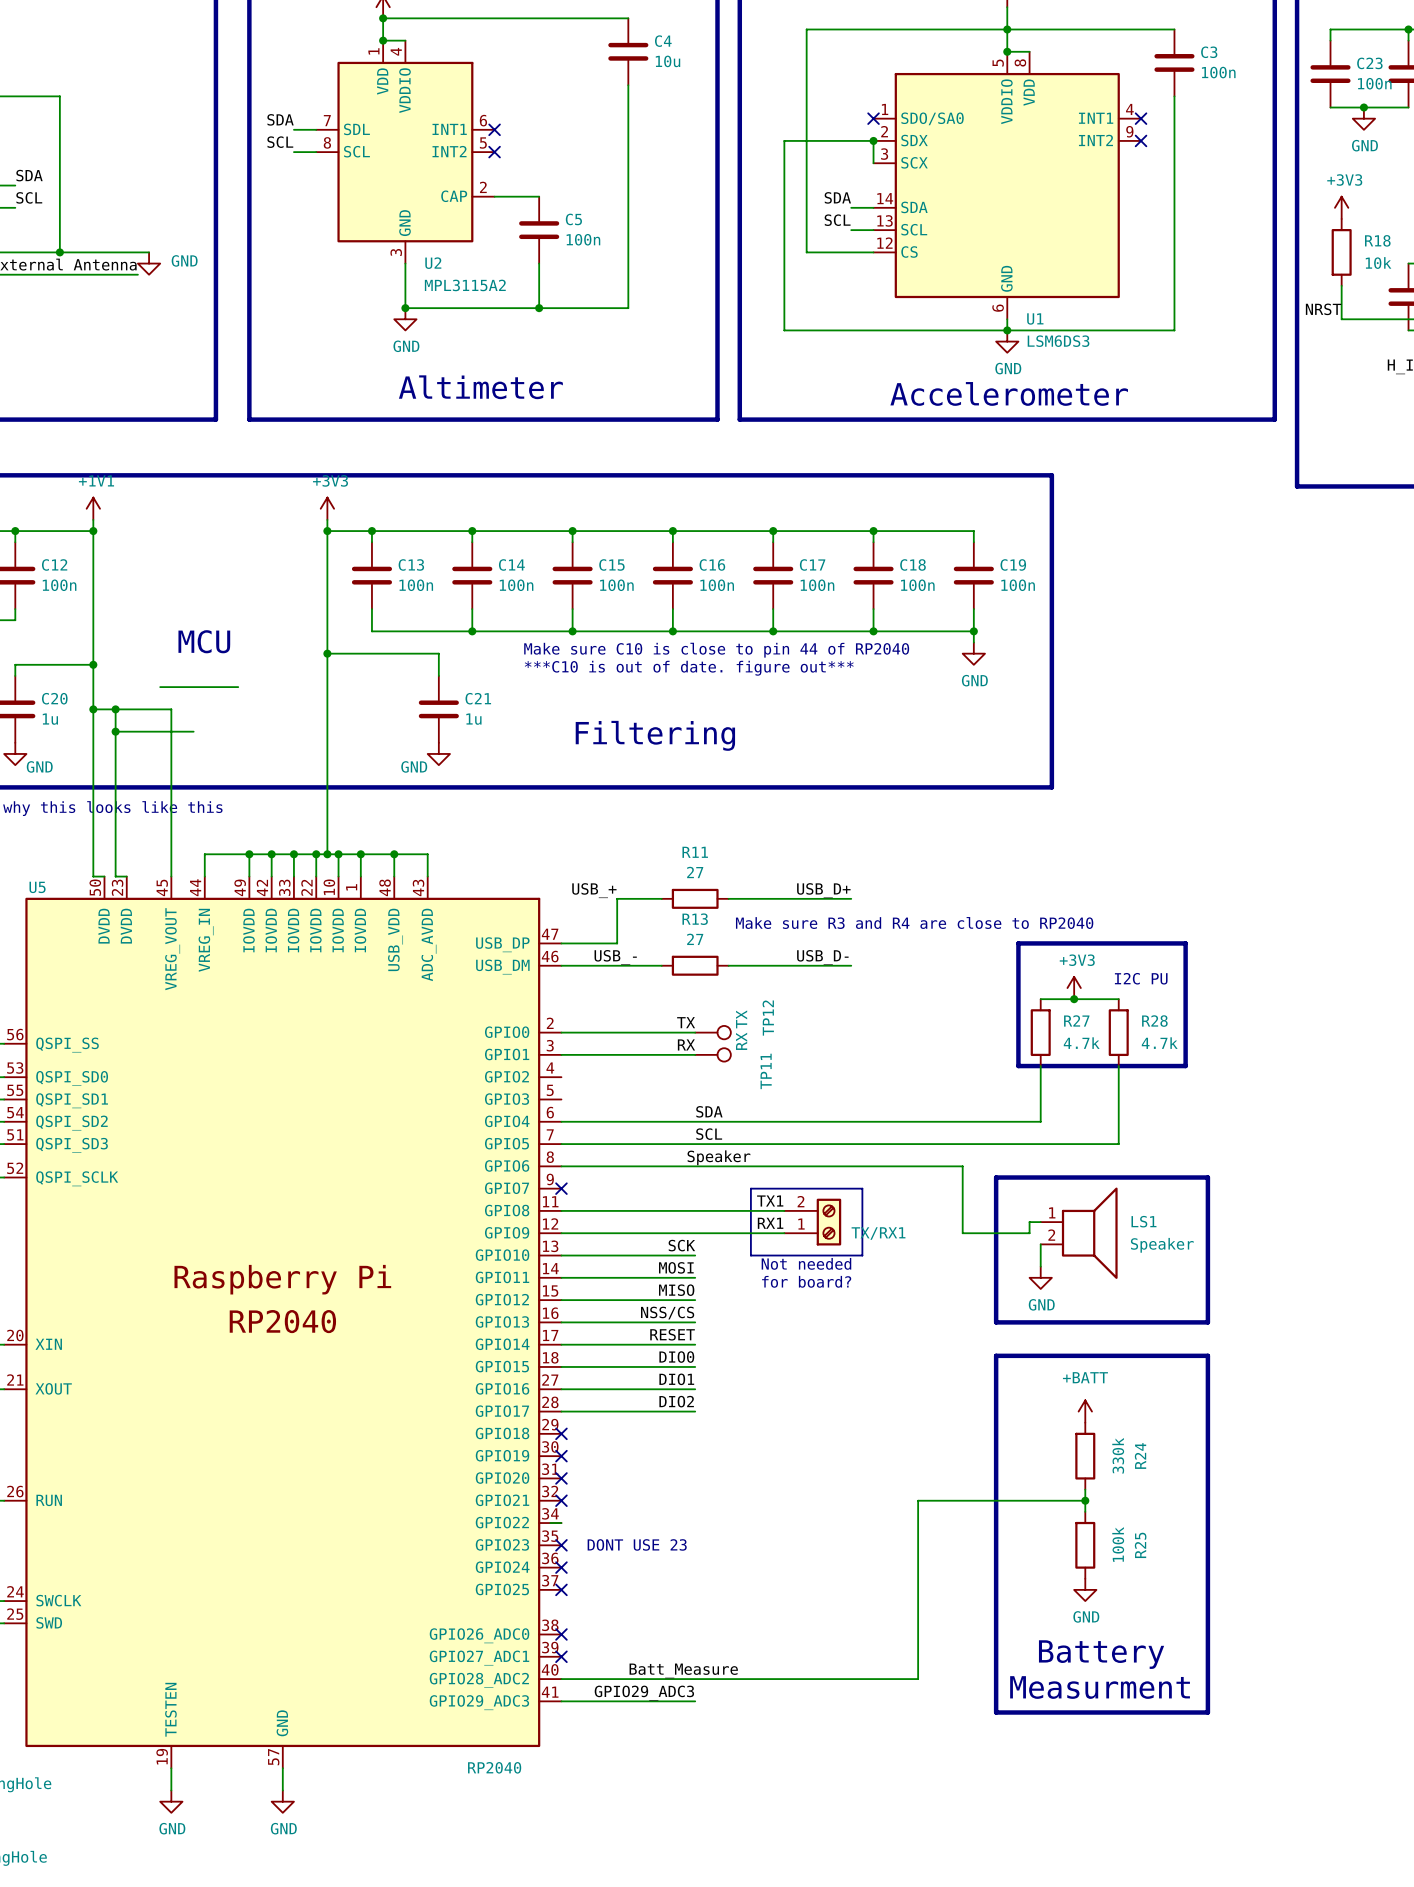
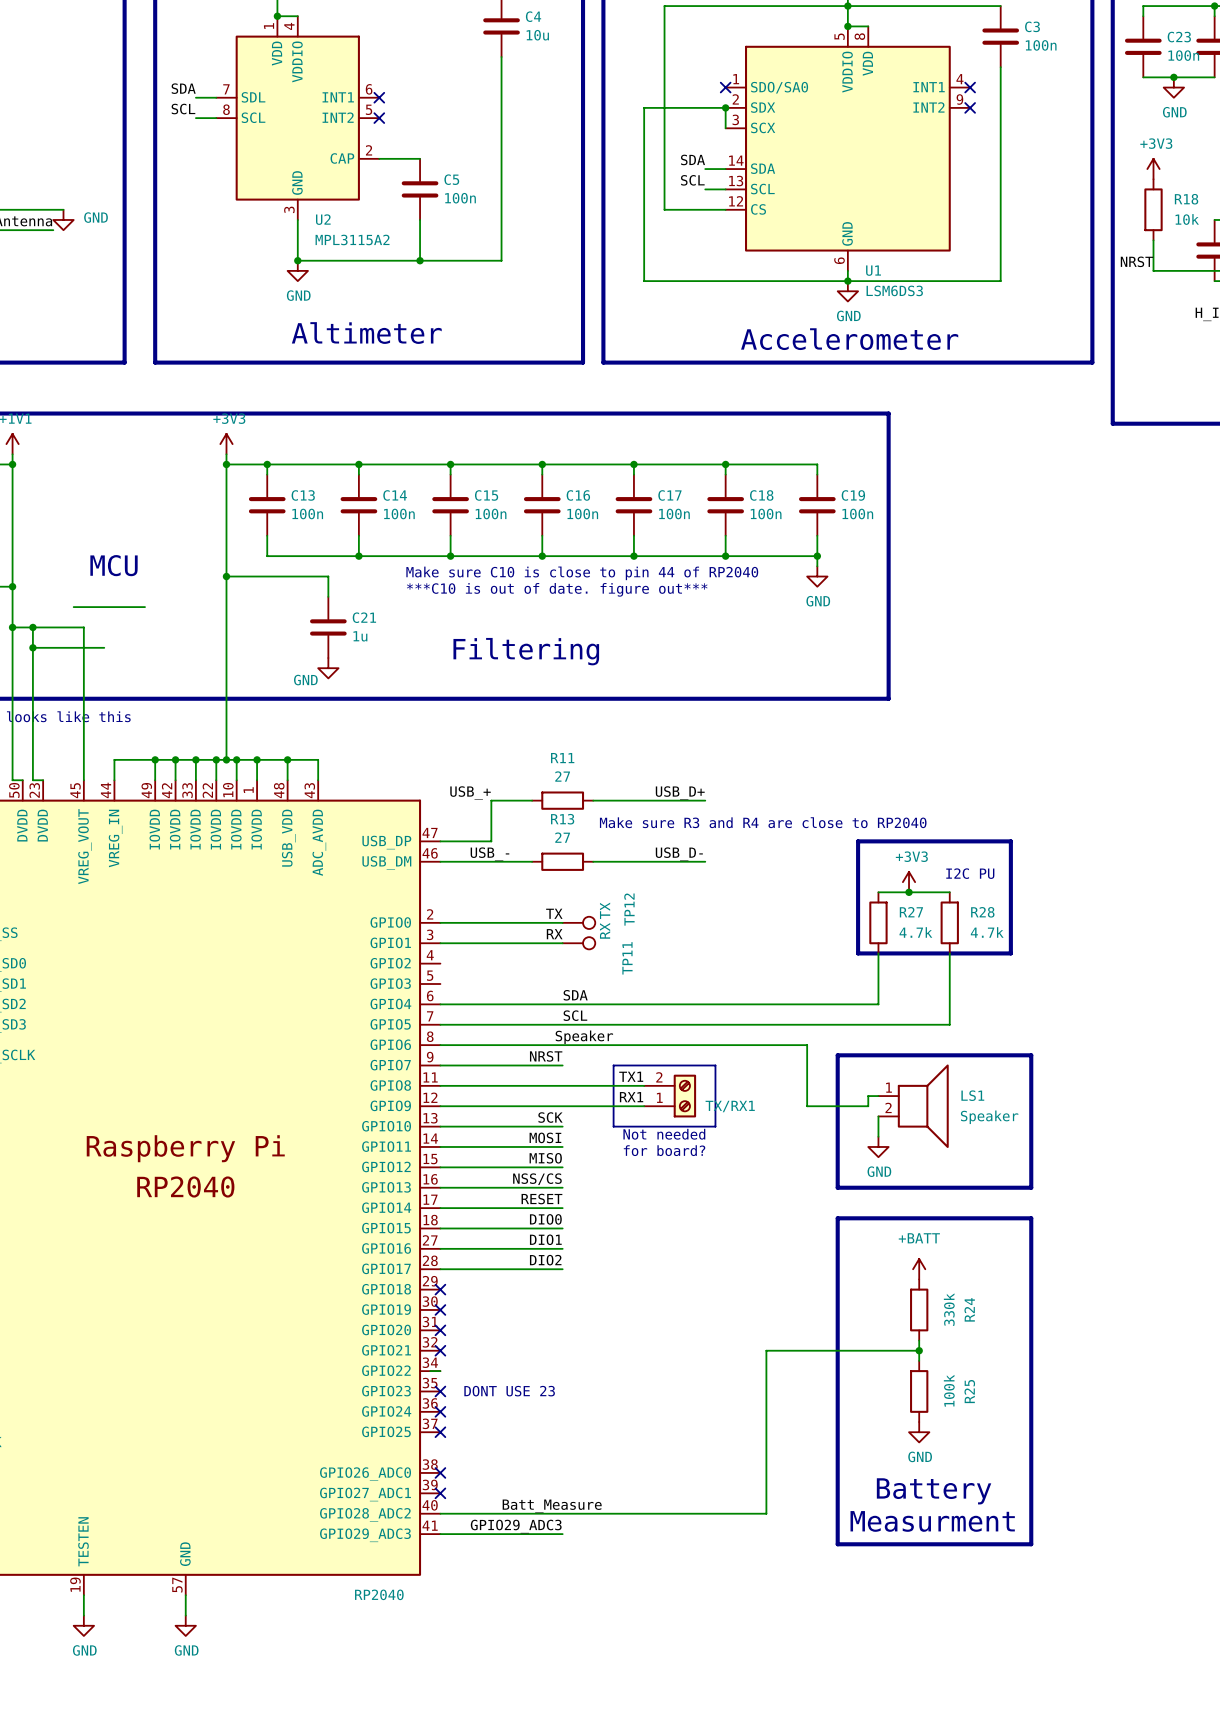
label: none -> NRST (546, 1056)
wire: none -> (440, 1065) (562, 1065)
no-connect mark: (561, 1188) -> none

